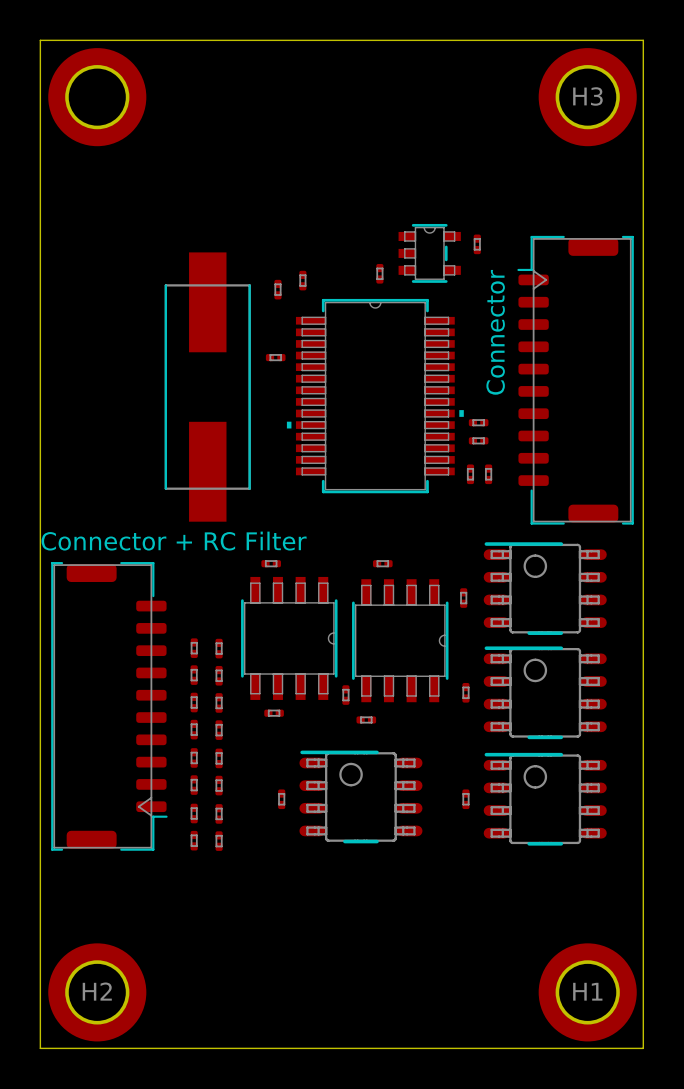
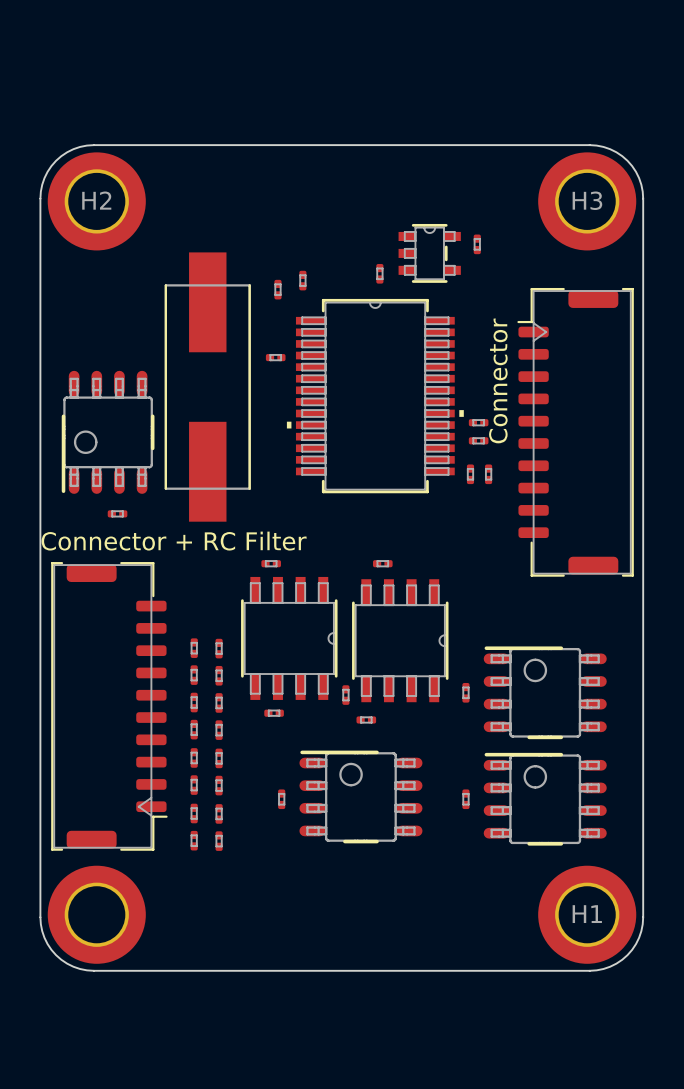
part: (97, 97) -> none
H3 position: (587, 97) -> (587, 201)
board edge: (40, 198) (40, 40) (643, 40) (643, 1048) (40, 1048) (40, 917) -> (40, 198) (44, 178) (56, 160) (73, 149) (93, 145) (596, 145) (616, 152) (632, 166) (641, 184) (643, 198) (643, 917) (639, 937) (632, 949) (616, 963) (603, 968) (589, 970) (93, 970) (73, 966) (56, 955) (44, 937) (40, 917)
text position: Connector (495, 332) -> Connector (498, 380)
part position: (575, 380) -> (575, 432)
part: none -> (108, 432)
part: (545, 588) -> none
part rotation: 0° (463, 598) -> 90° clockwise (117, 513)
part position: (463, 598) -> (117, 513)
part: none -> (96, 914)
H2 position: (97, 992) -> (96, 201)
H1 position: (587, 992) -> (587, 914)

